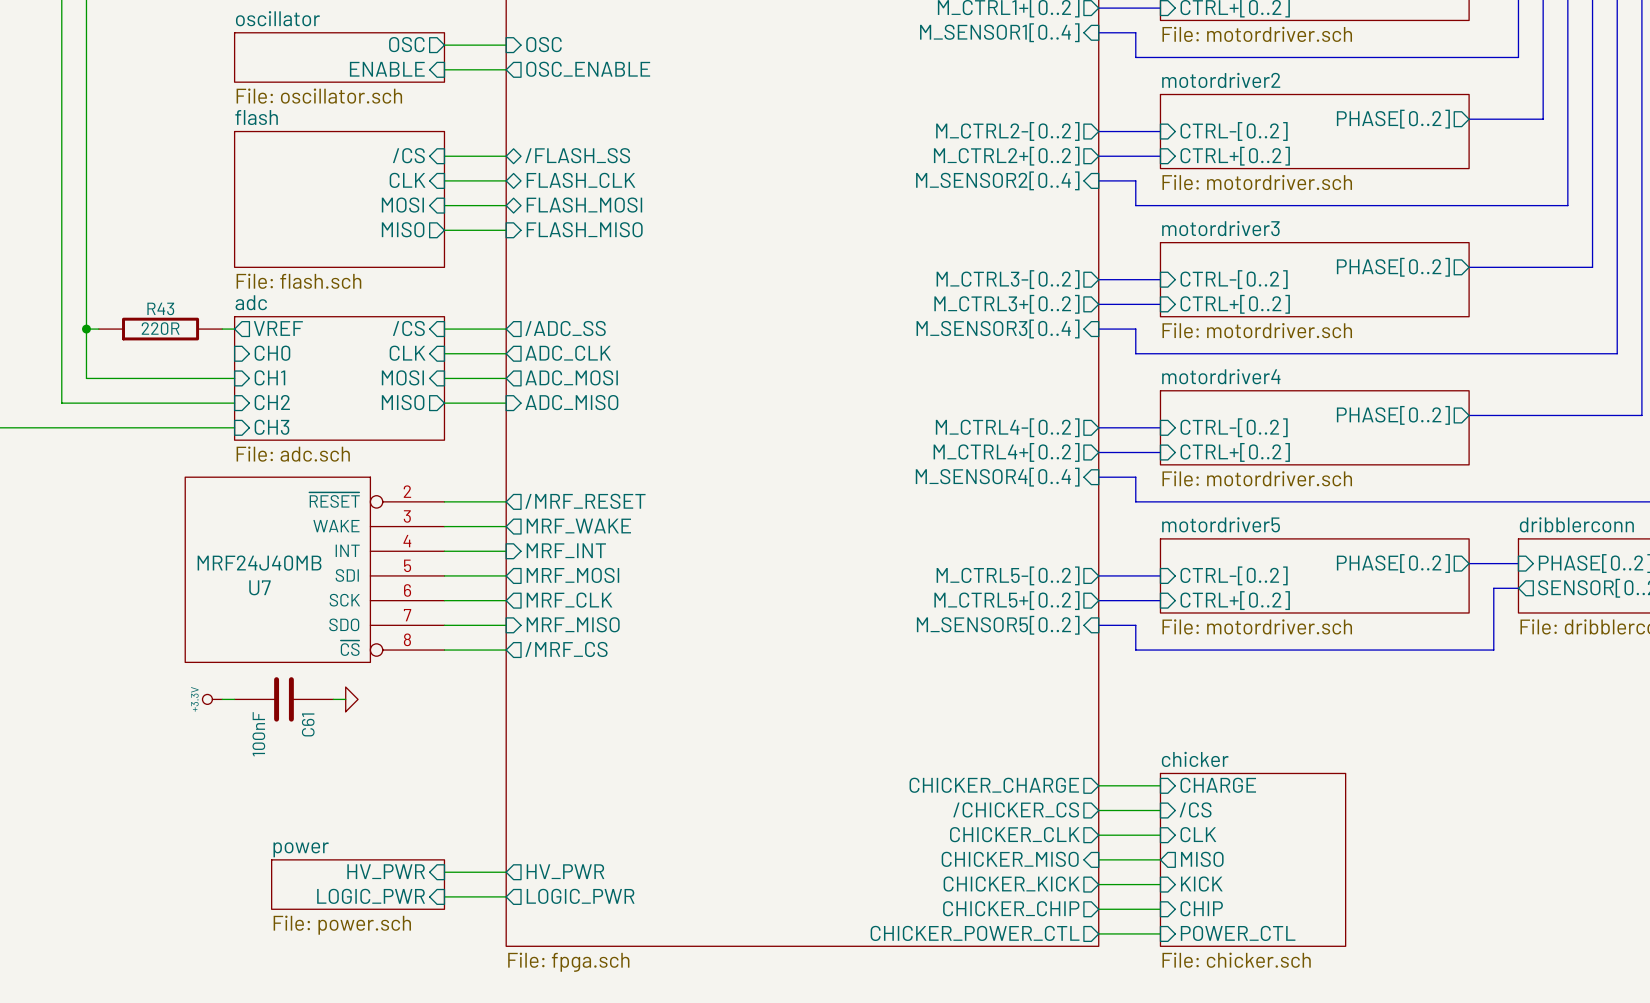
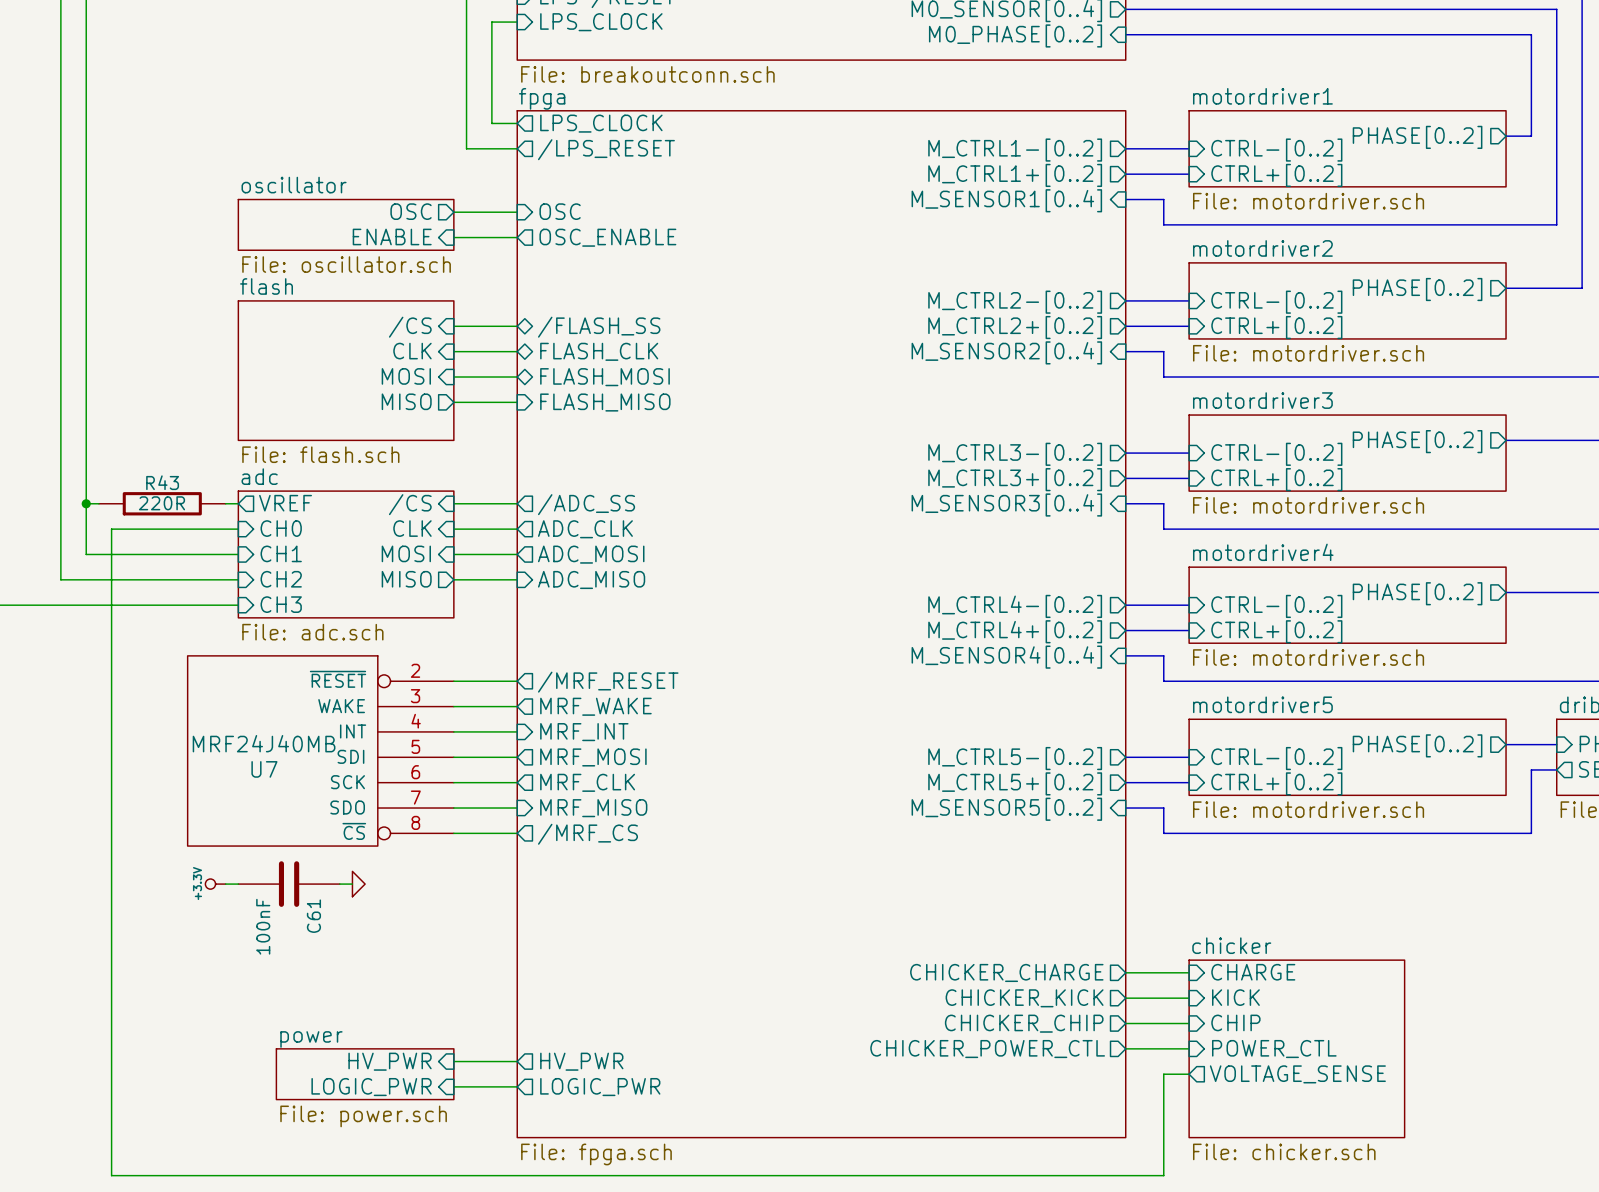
sheet pin: /CHICKER_CS (1016, 809) -> CHICKER_KICK (1024, 998)
sheet pin: /CS (1195, 809) -> KICK (1235, 997)
sheet pin: CHICKER_CLK (1014, 834) -> CHICKER_CHIP (1024, 1023)
sheet pin: CLK (1198, 834) -> CHIP (1235, 1022)
sheet pin shape: input (1010, 859) -> output (987, 1049)
sheet pin: CHICKER_MISO (1010, 859) -> CHICKER_POWER_CTL (987, 1049)
sheet pin shape: output (1202, 859) -> input (1274, 1049)
sheet pin: MISO (1202, 859) -> POWER_CTL (1274, 1049)
sheet chicker: File: chicker.sch (1253, 859) -> none
sheet chicker: none -> File: chicker.sch (1296, 1048)
sheet pin: CHICKER_KICK (1011, 884) -> none
wire: (1098, 884) (1135, 884) -> (238, 529) (111, 529) (111, 1175) (1163, 1175) (1163, 1074)
sheet pin shape: input (1201, 884) -> output (1297, 1074)
sheet pin: KICK (1201, 884) -> VOLTAGE_SENSE (1297, 1074)
sheet pin: CHICKER_CHIP (1011, 908) -> none
sheet pin: CHIP (1201, 908) -> none
wire: (1098, 909) (1160, 909) -> none
sheet pin: CHICKER_POWER_CTL (975, 933) -> none
wire: (1098, 933) (1160, 933) -> none
sheet pin: POWER_CTL (1238, 933) -> none

